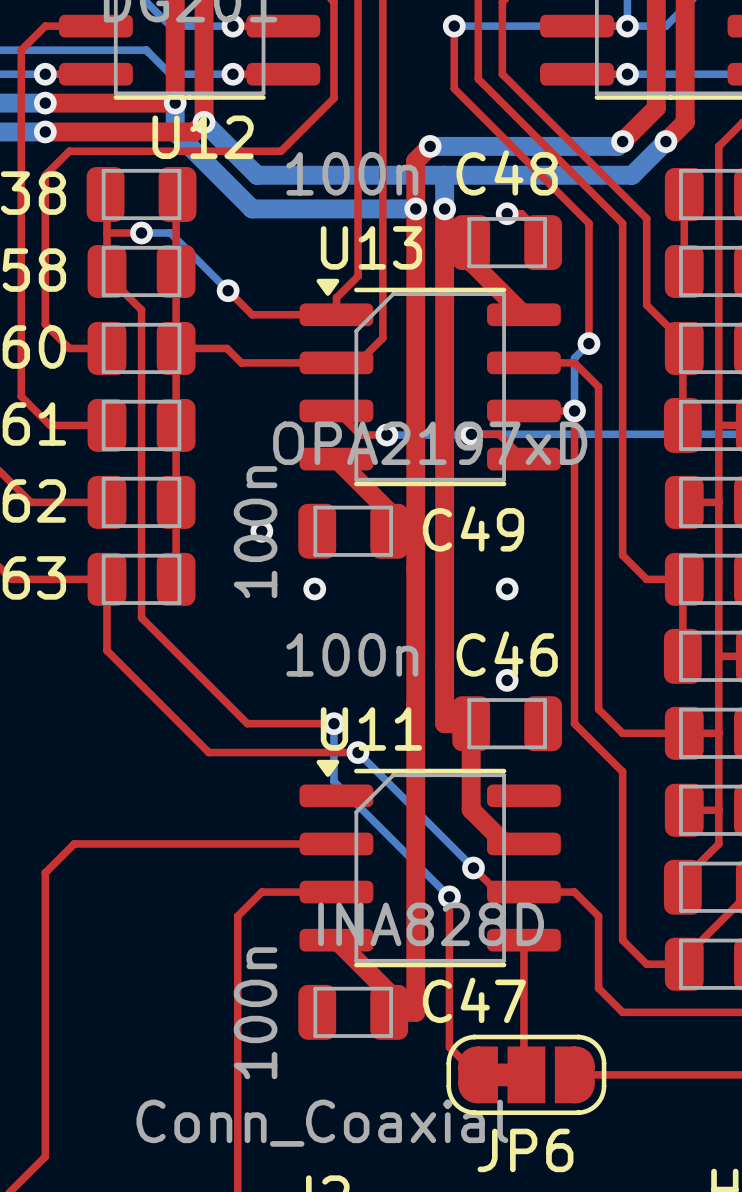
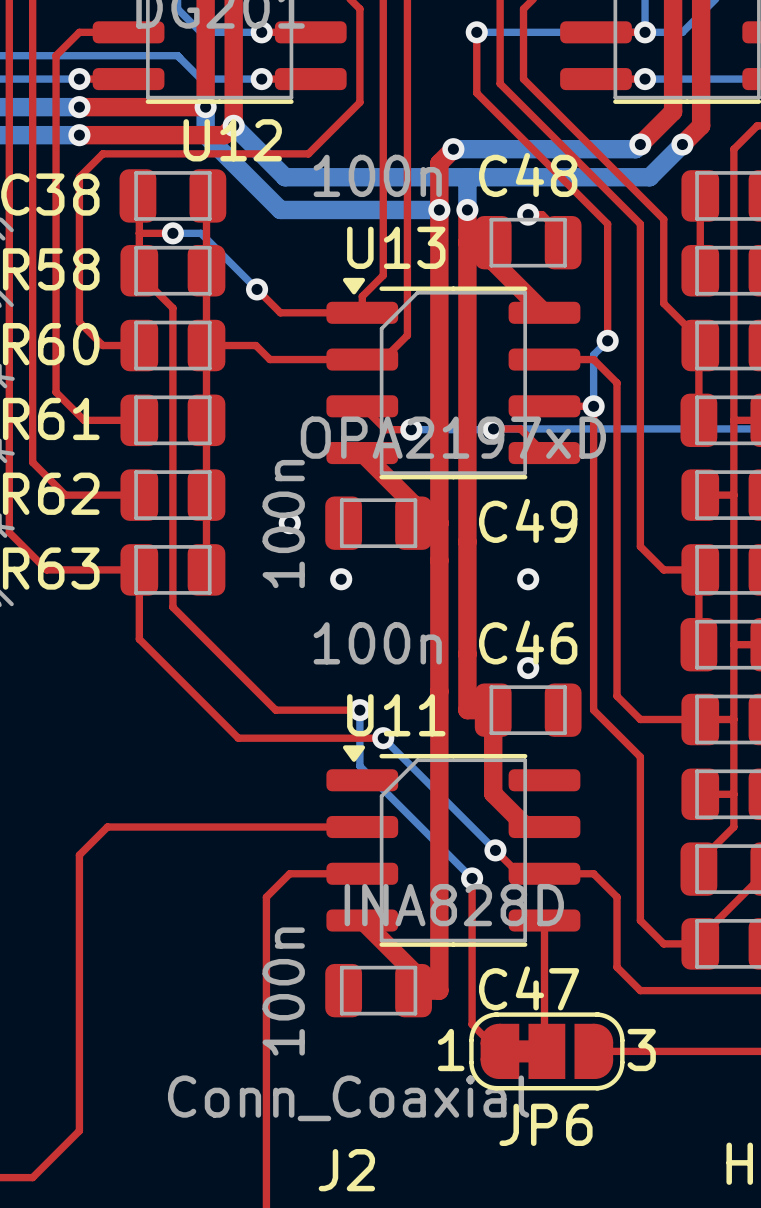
C49 name position: C49 (473, 528) -> C49 (528, 520)
C47 name position: C47 (474, 1000) -> C47 (529, 988)
JP6 text: none -> 1 (451, 1050)
JP6 text: none -> 3 (641, 1050)

